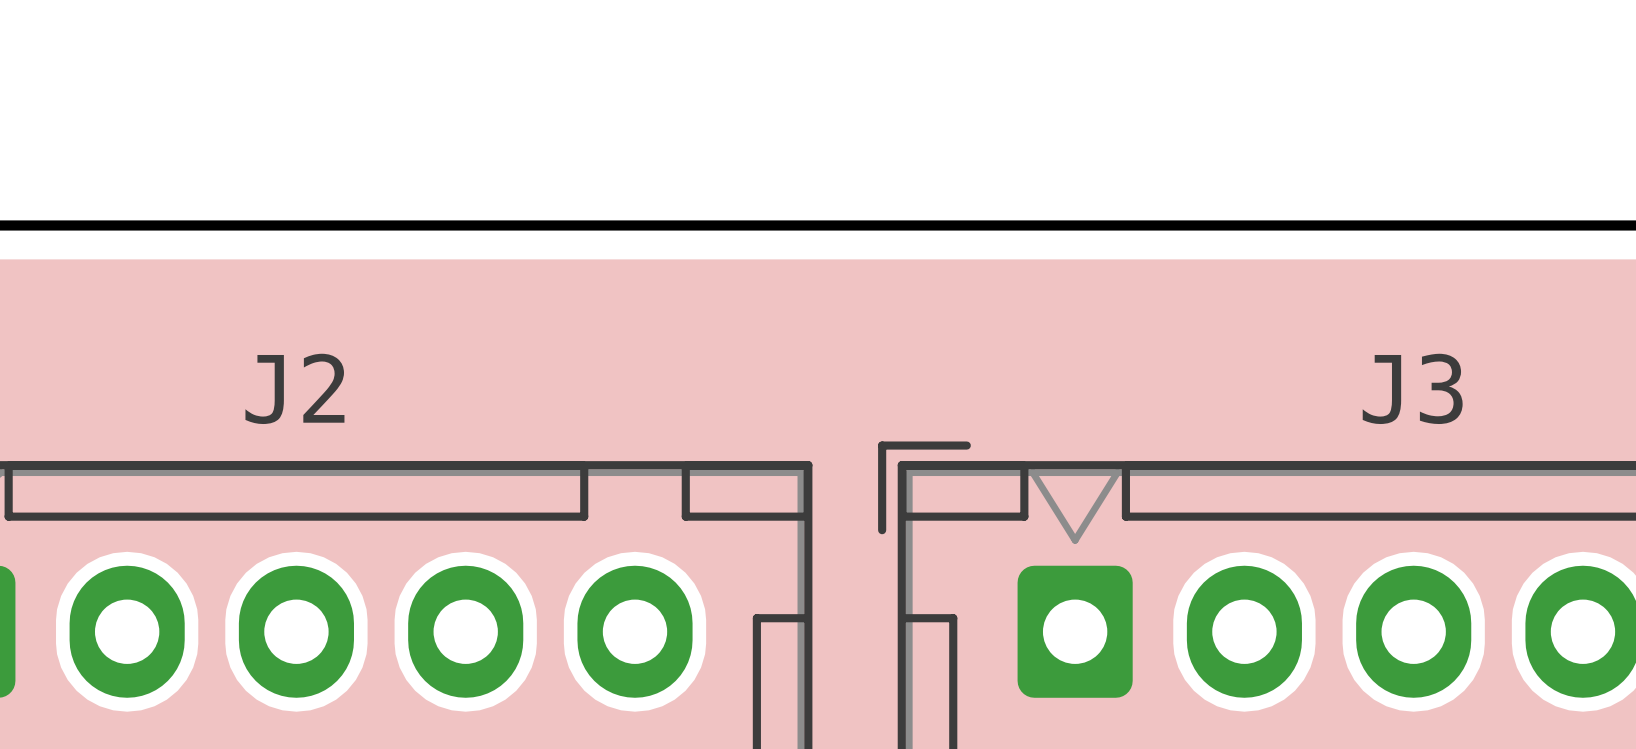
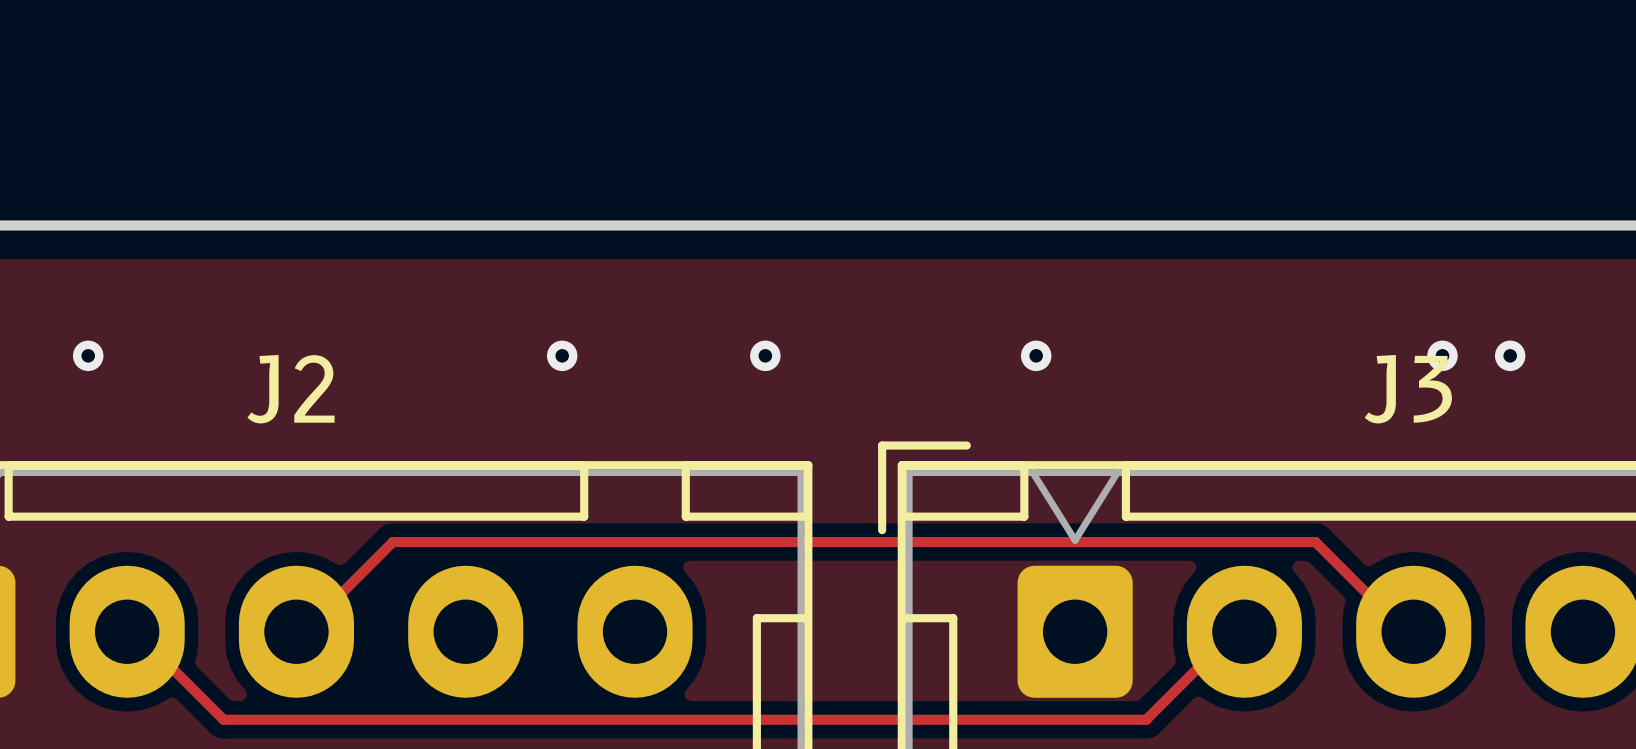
via: none -> (88, 355)
via: none -> (562, 355)
via: none -> (765, 355)
via: none -> (1036, 355)
via: none -> (1442, 355)
via: none -> (1510, 355)
track: none -> (130, 635) (139, 635) (223, 719) (1146, 719) (1230, 635) (1247, 635)
track: none -> (299, 635) (392, 542) (1315, 542) (1408, 635) (1417, 635)

